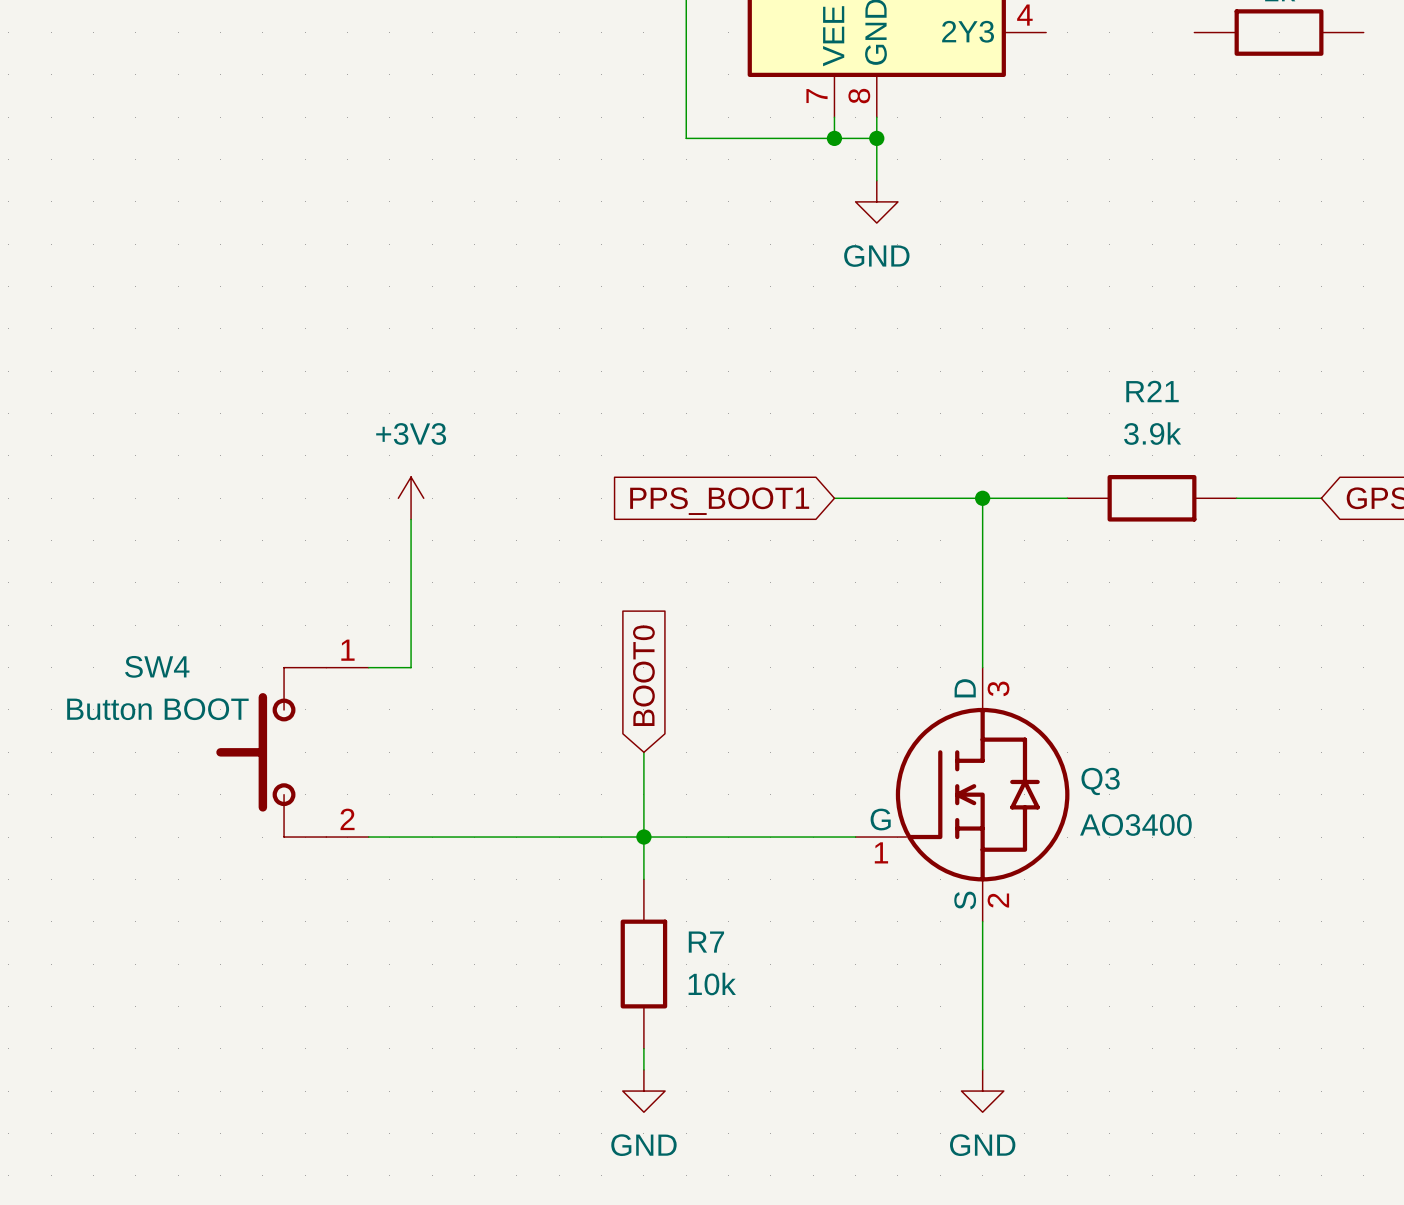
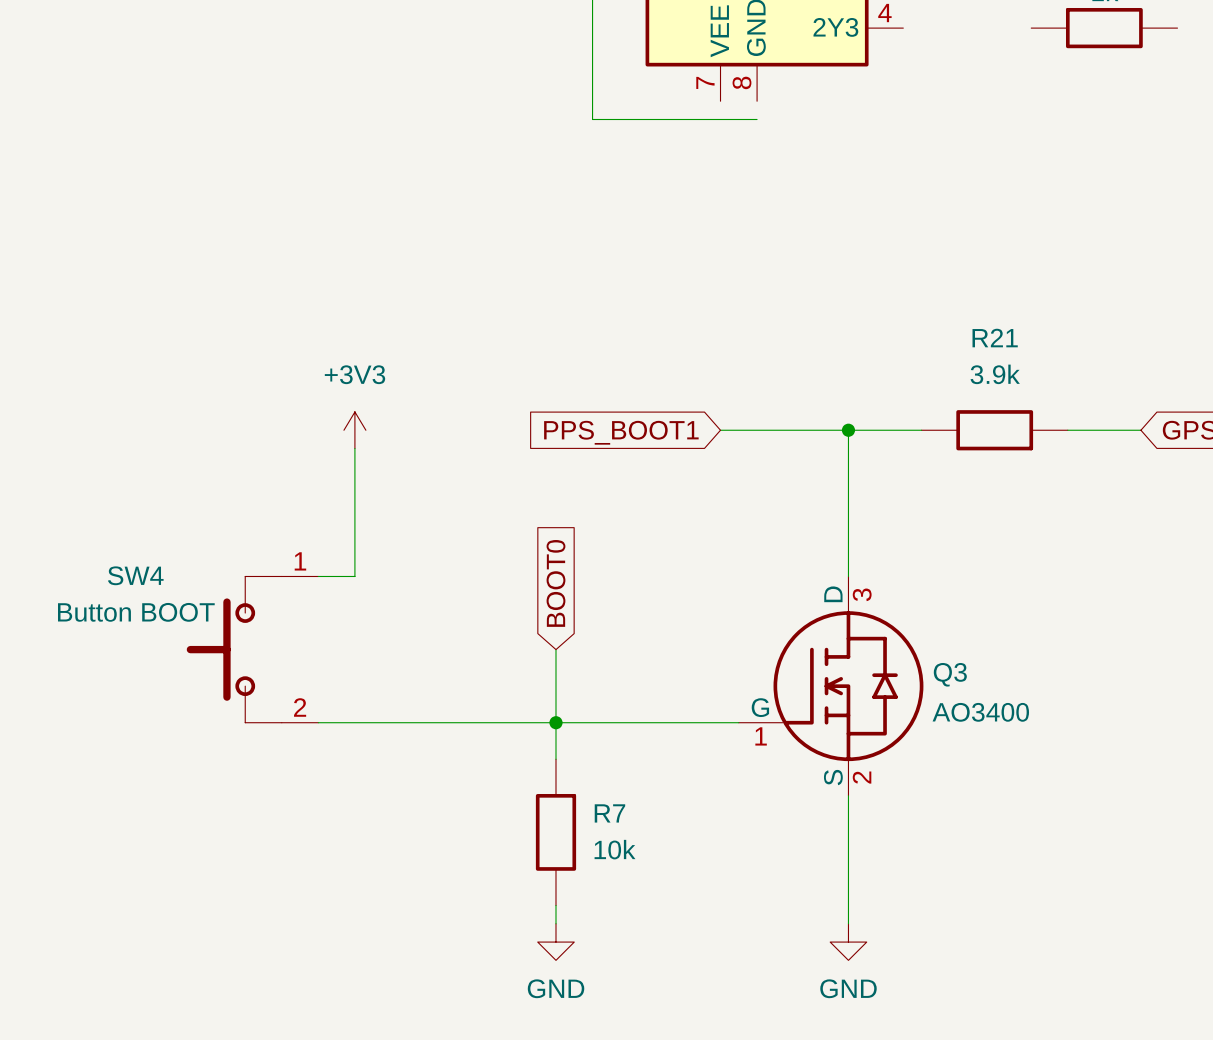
wire: (834, 117) (834, 138) -> none
wire: (876, 117) (876, 180) -> none
junction: (834, 138) -> none
junction: (876, 138) -> none
power symbol: GND (876, 201) -> none

